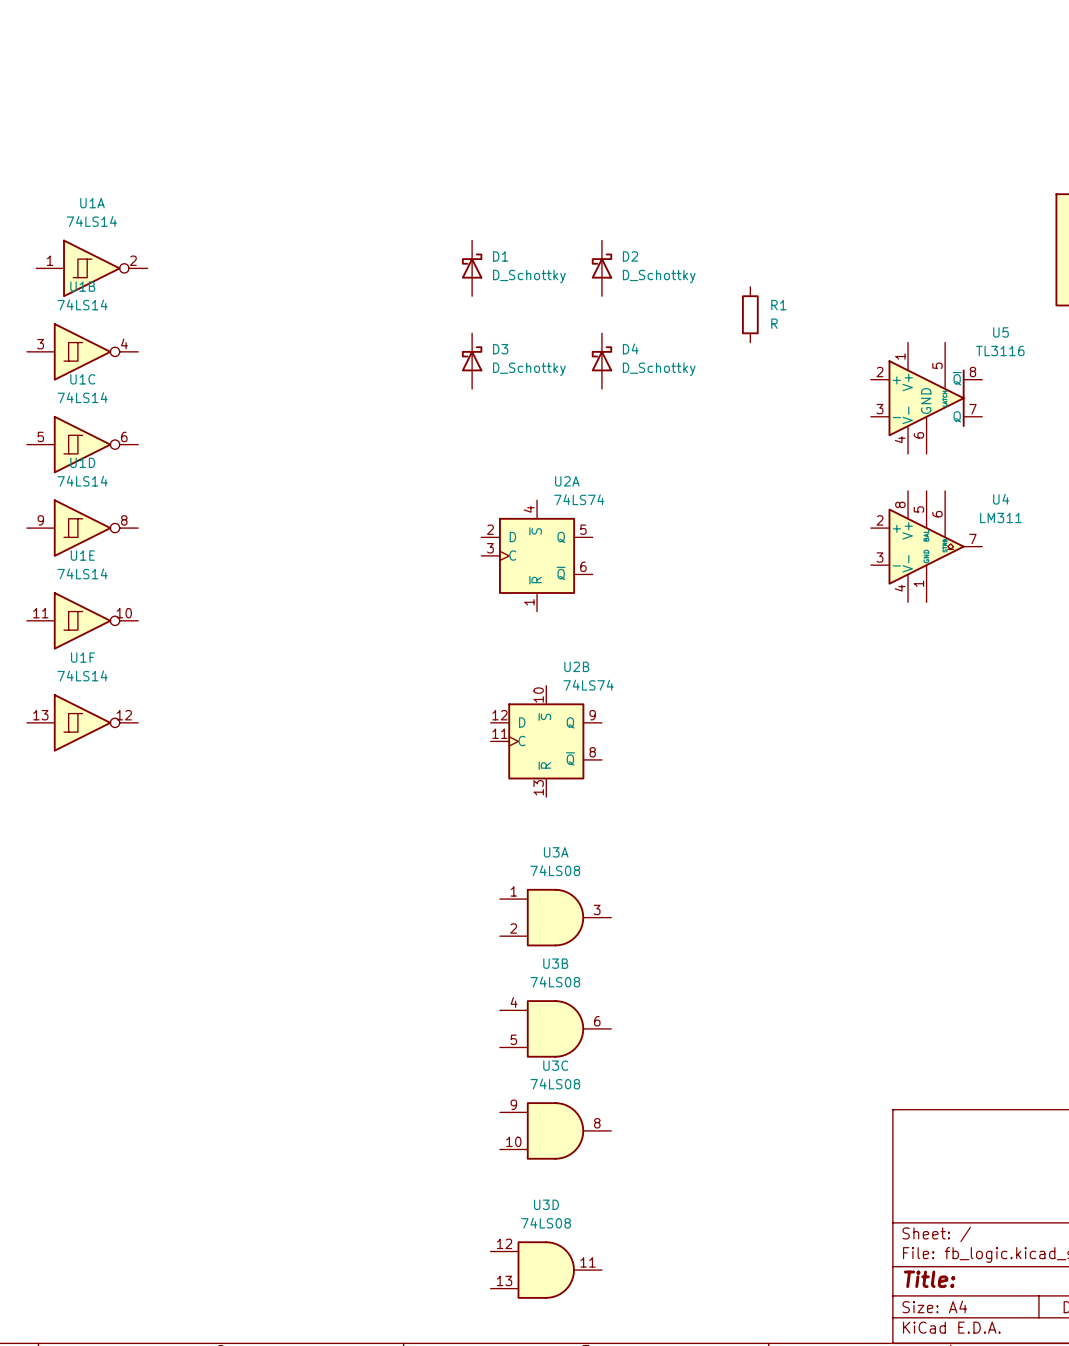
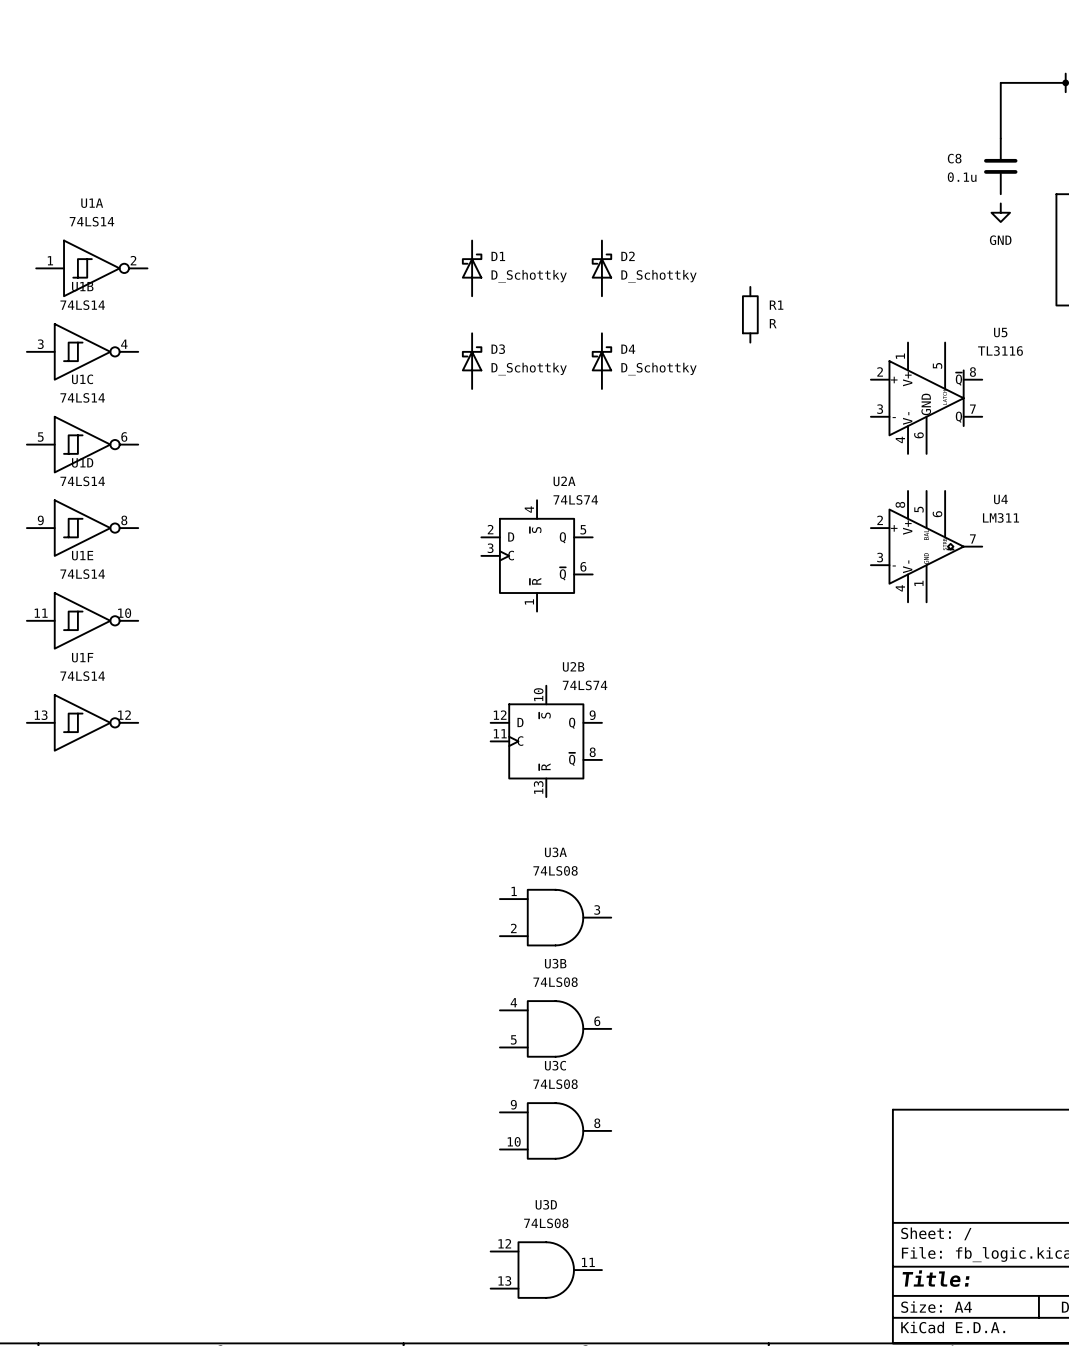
wire: none -> (1065, 73) (1065, 92)
wire: none -> (1065, 82) (1000, 82) (1000, 138)
junction: none -> (1065, 82)
C8: none -> 0.1u (1000, 166)
power symbol: none -> GND (1000, 212)

